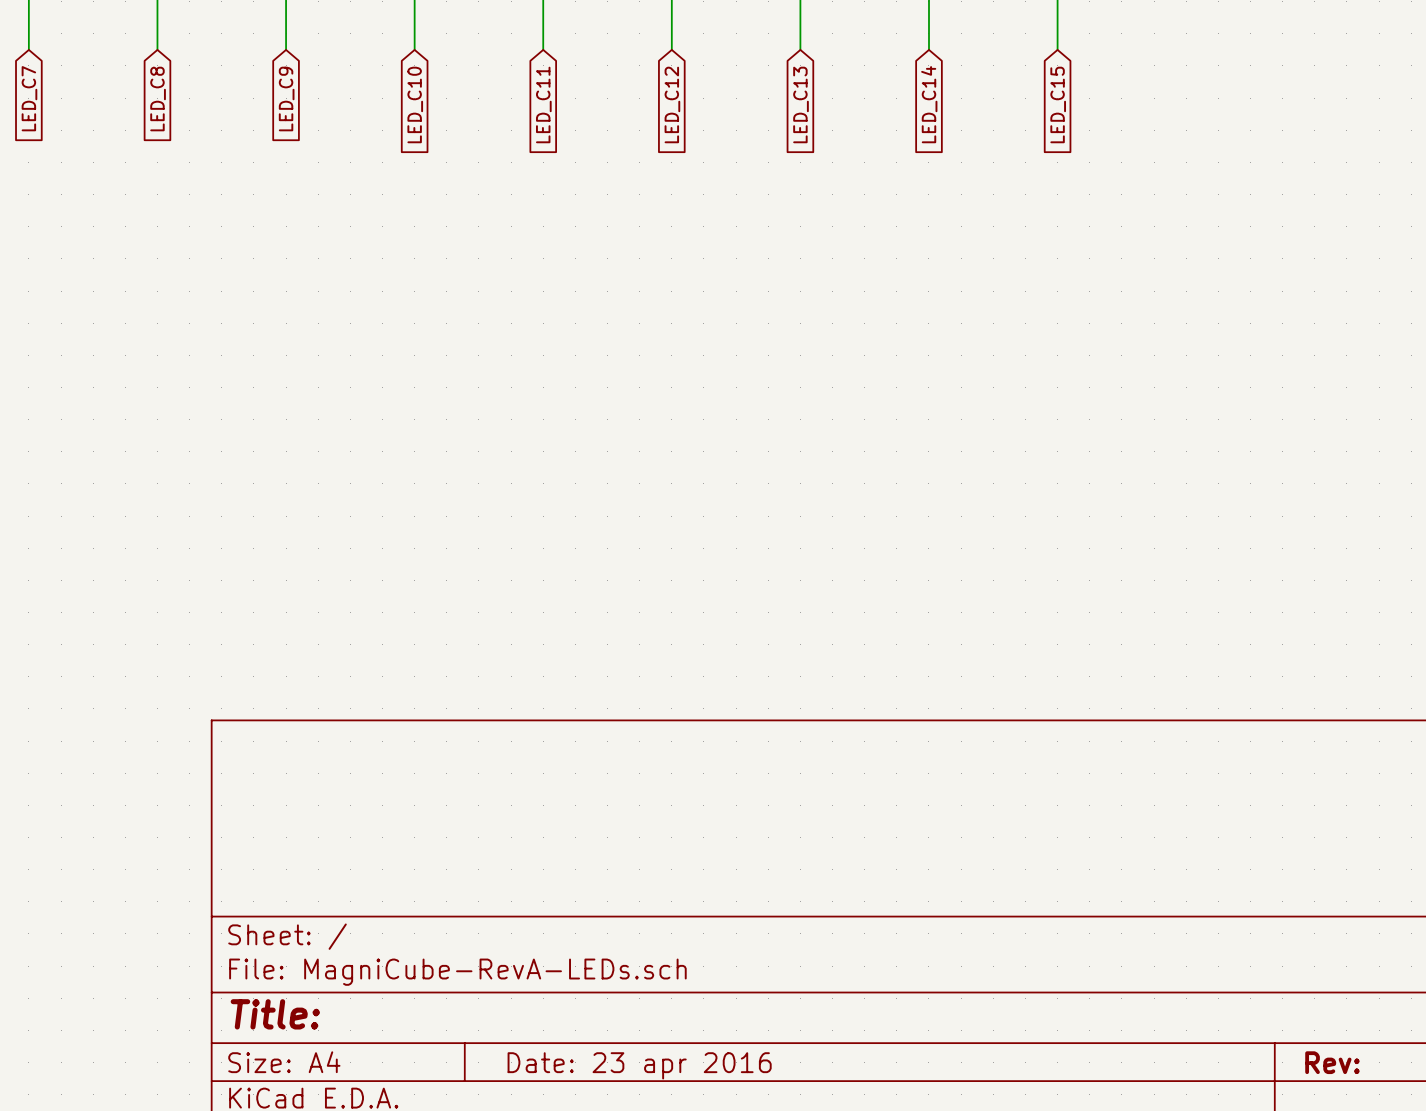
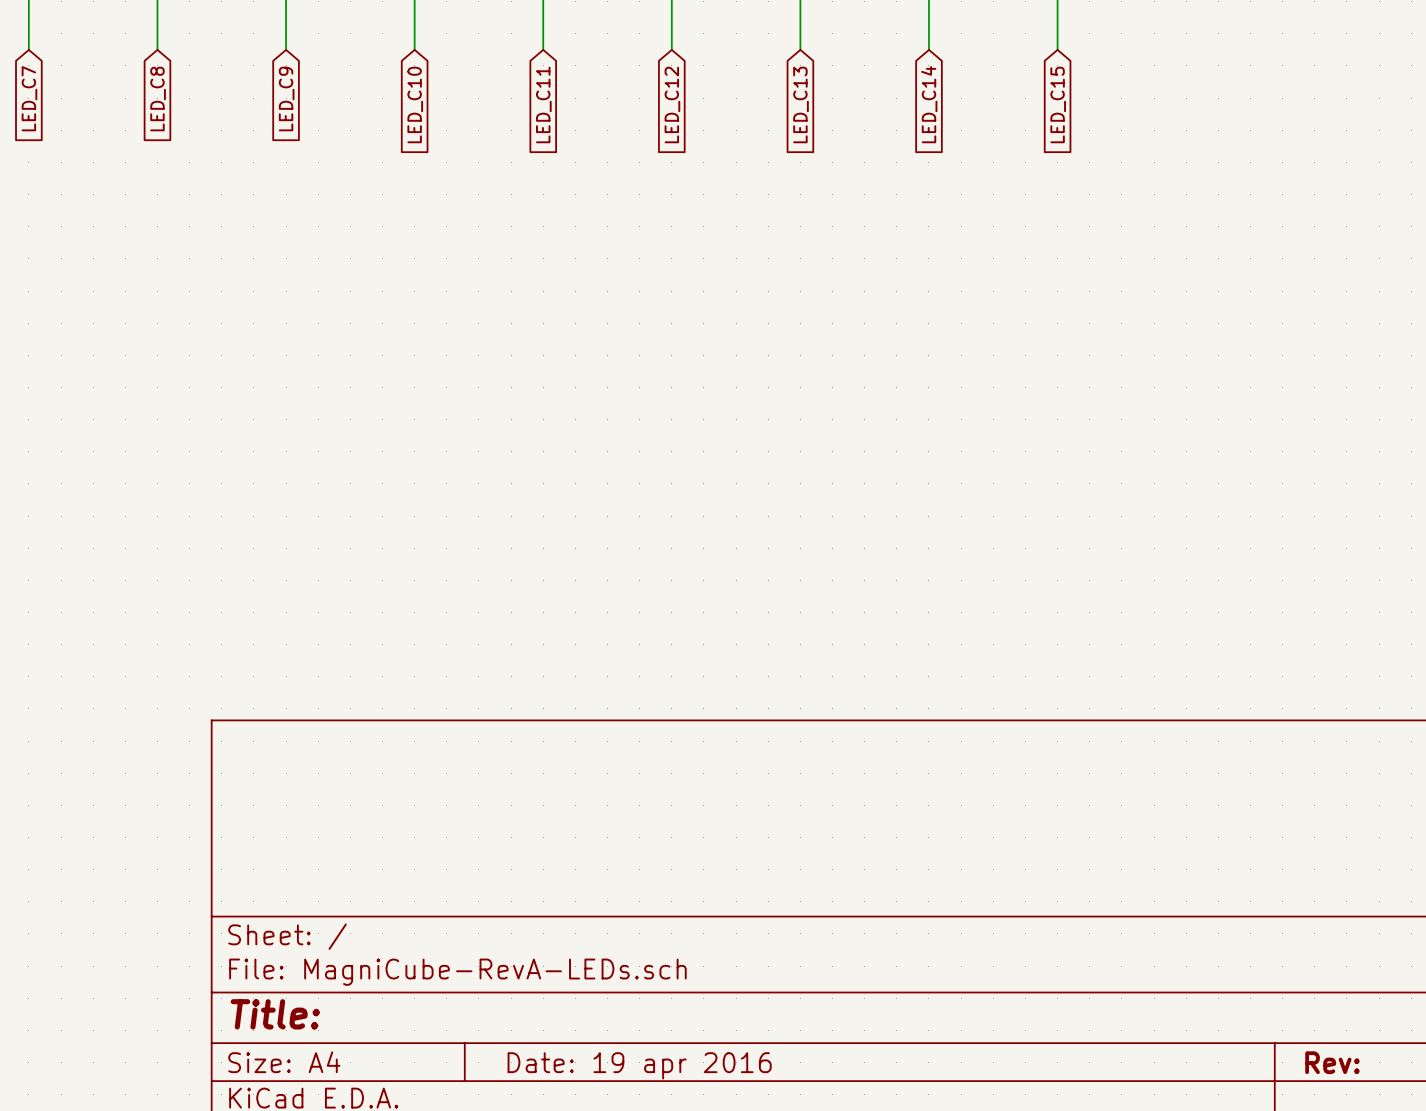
title block: Date: 23 apr 2016 (639, 1065) -> Date: 19 apr 2016 (639, 1065)

